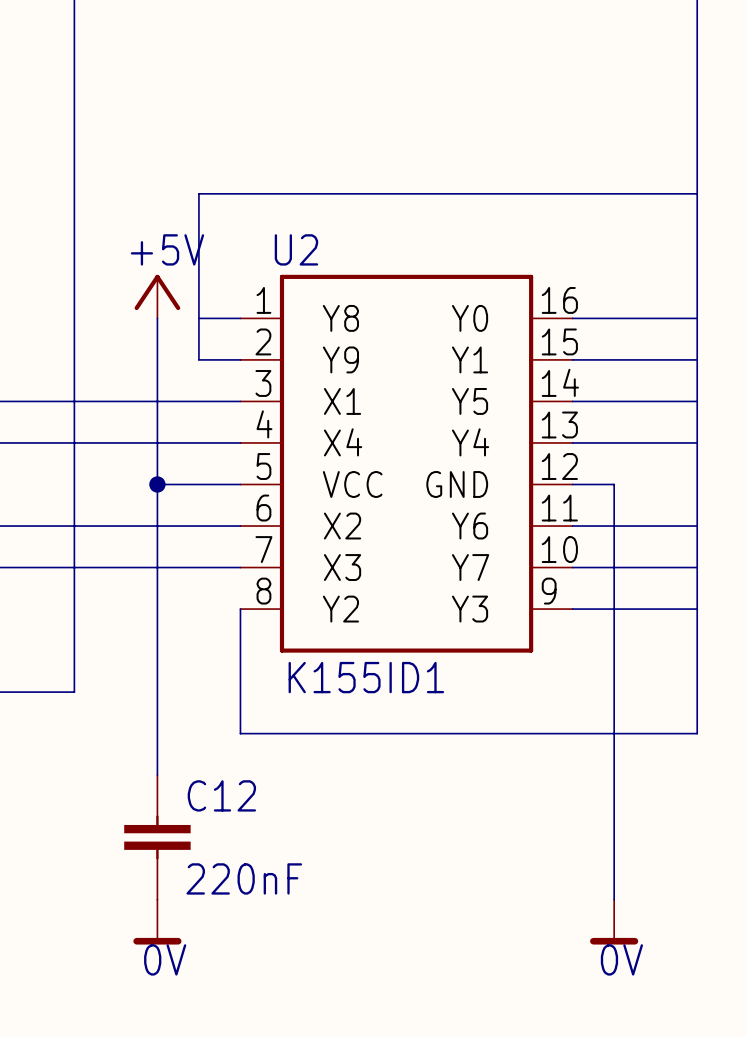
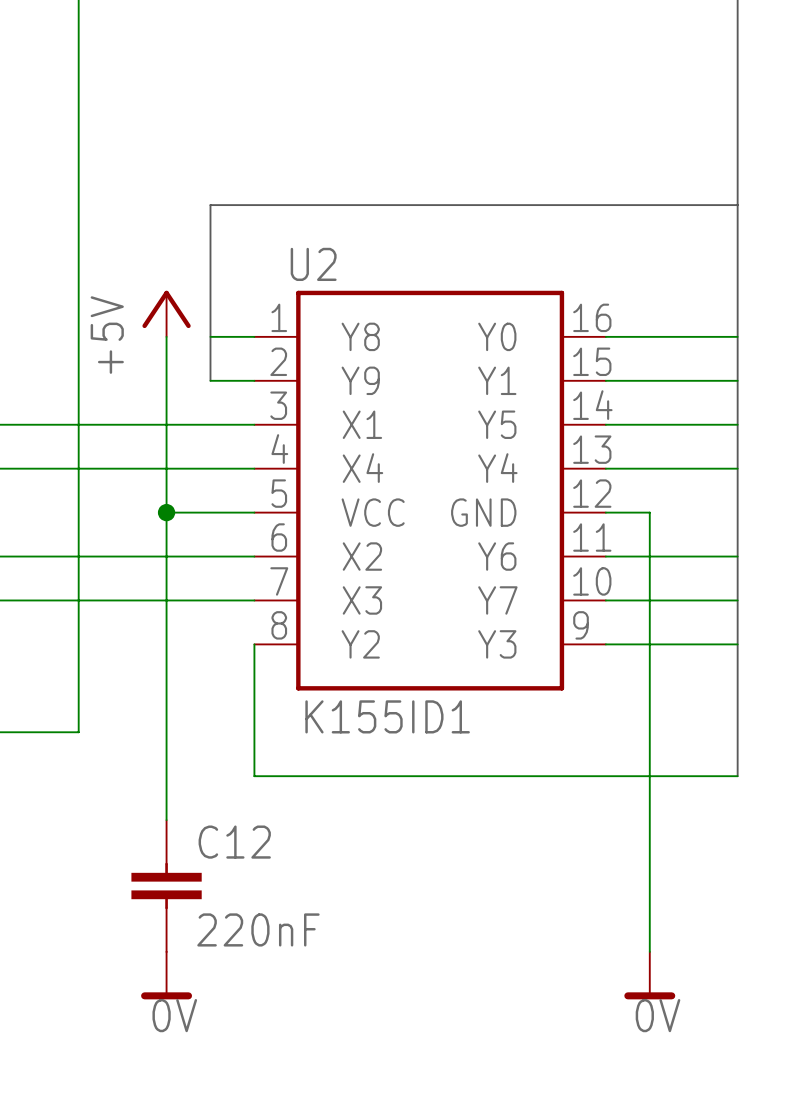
power symbol text rotation: 0° (167, 249) -> 90° counterclockwise (107, 335)

